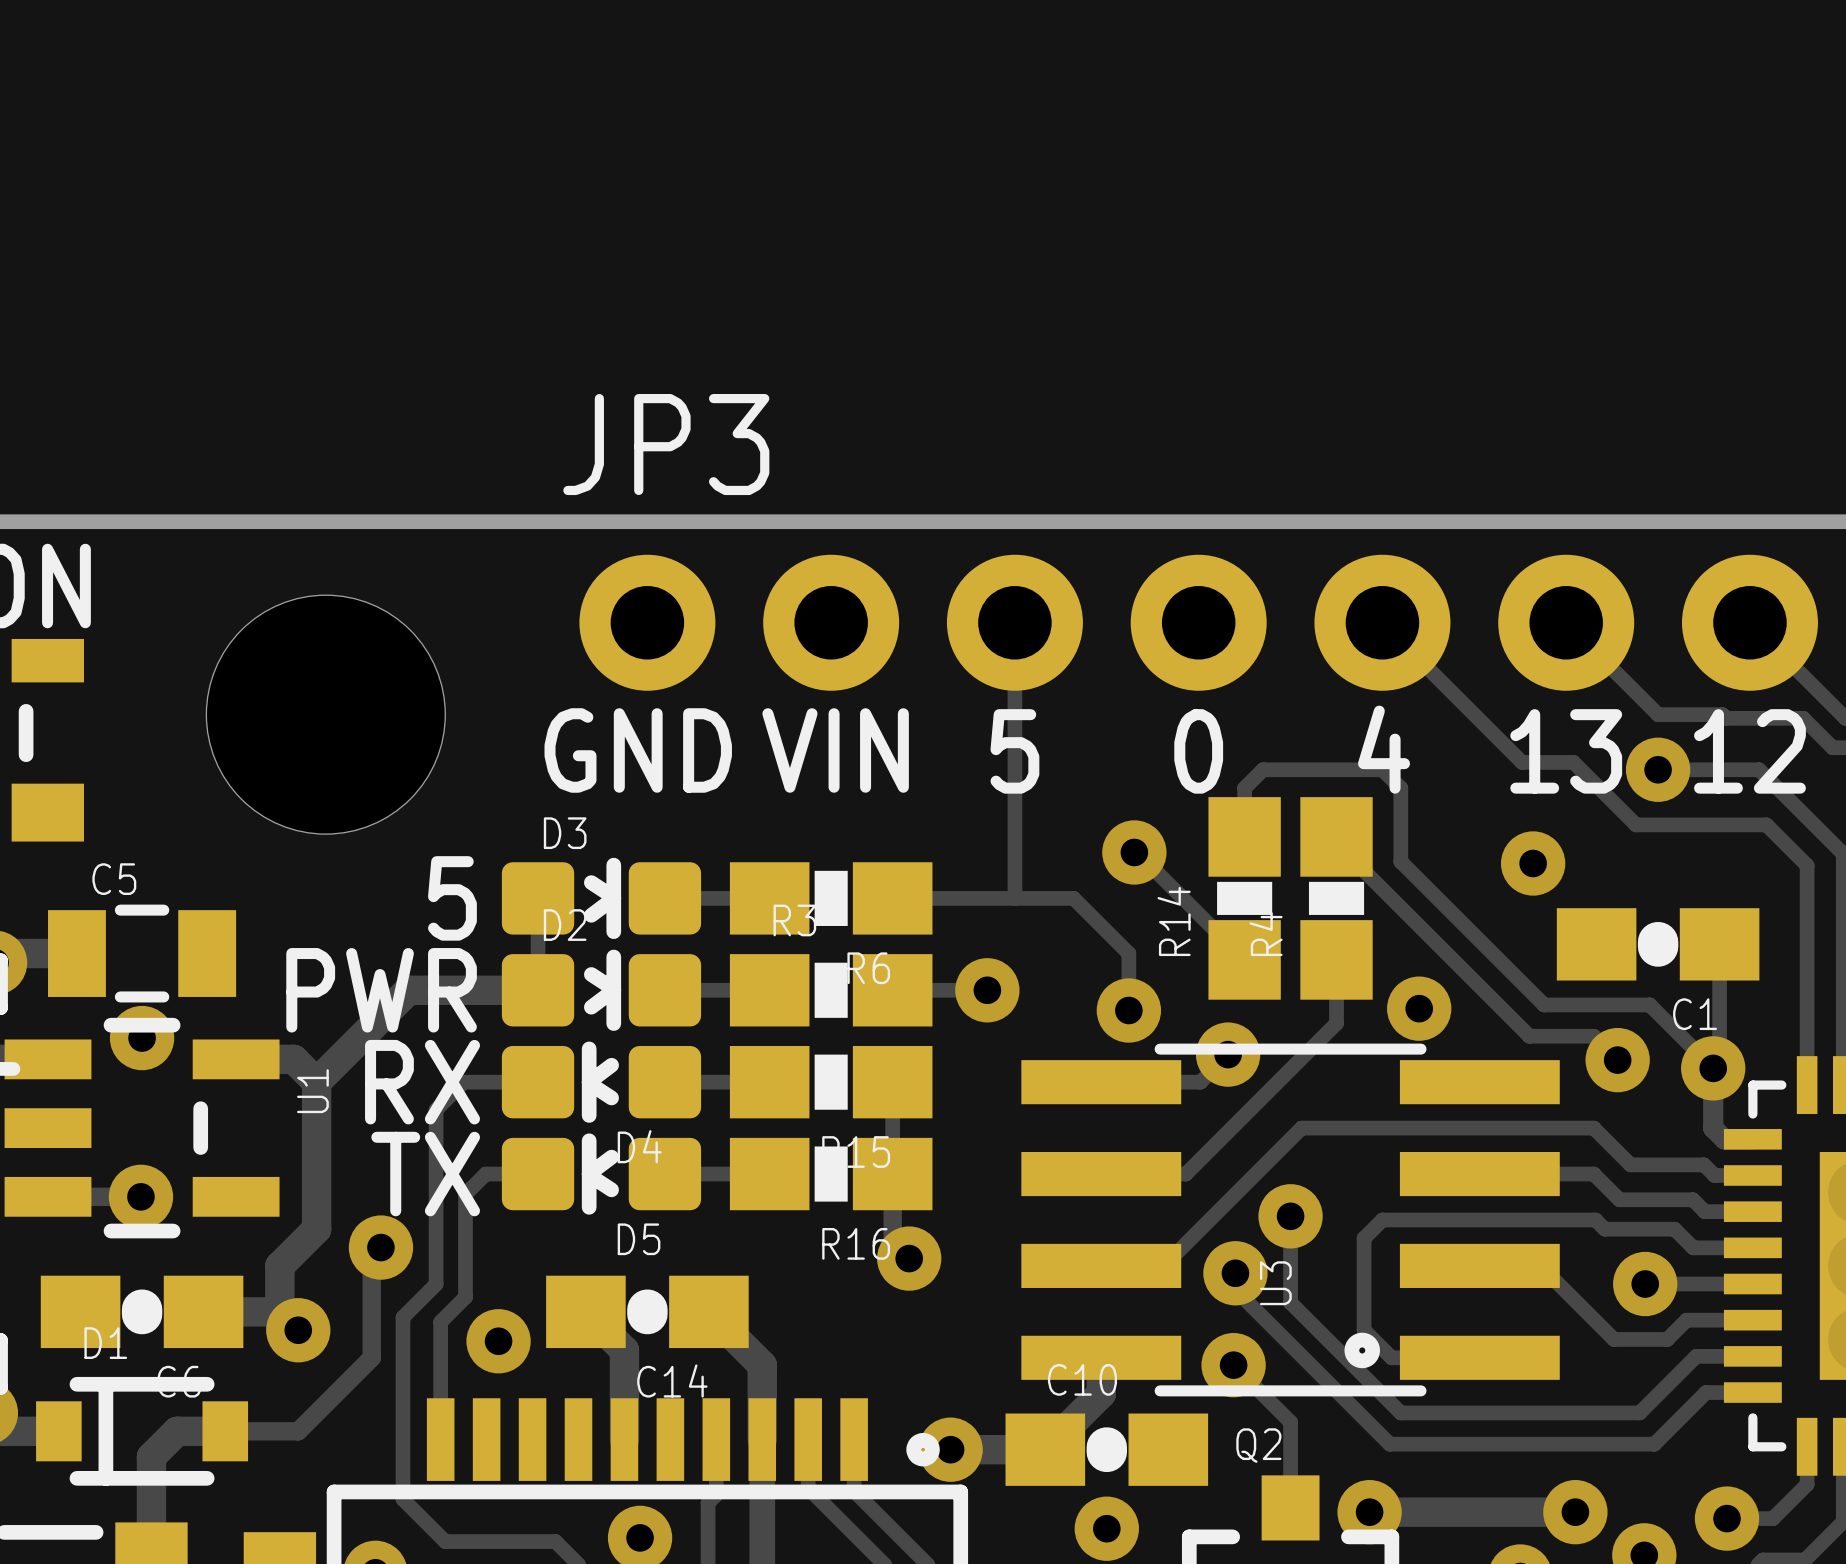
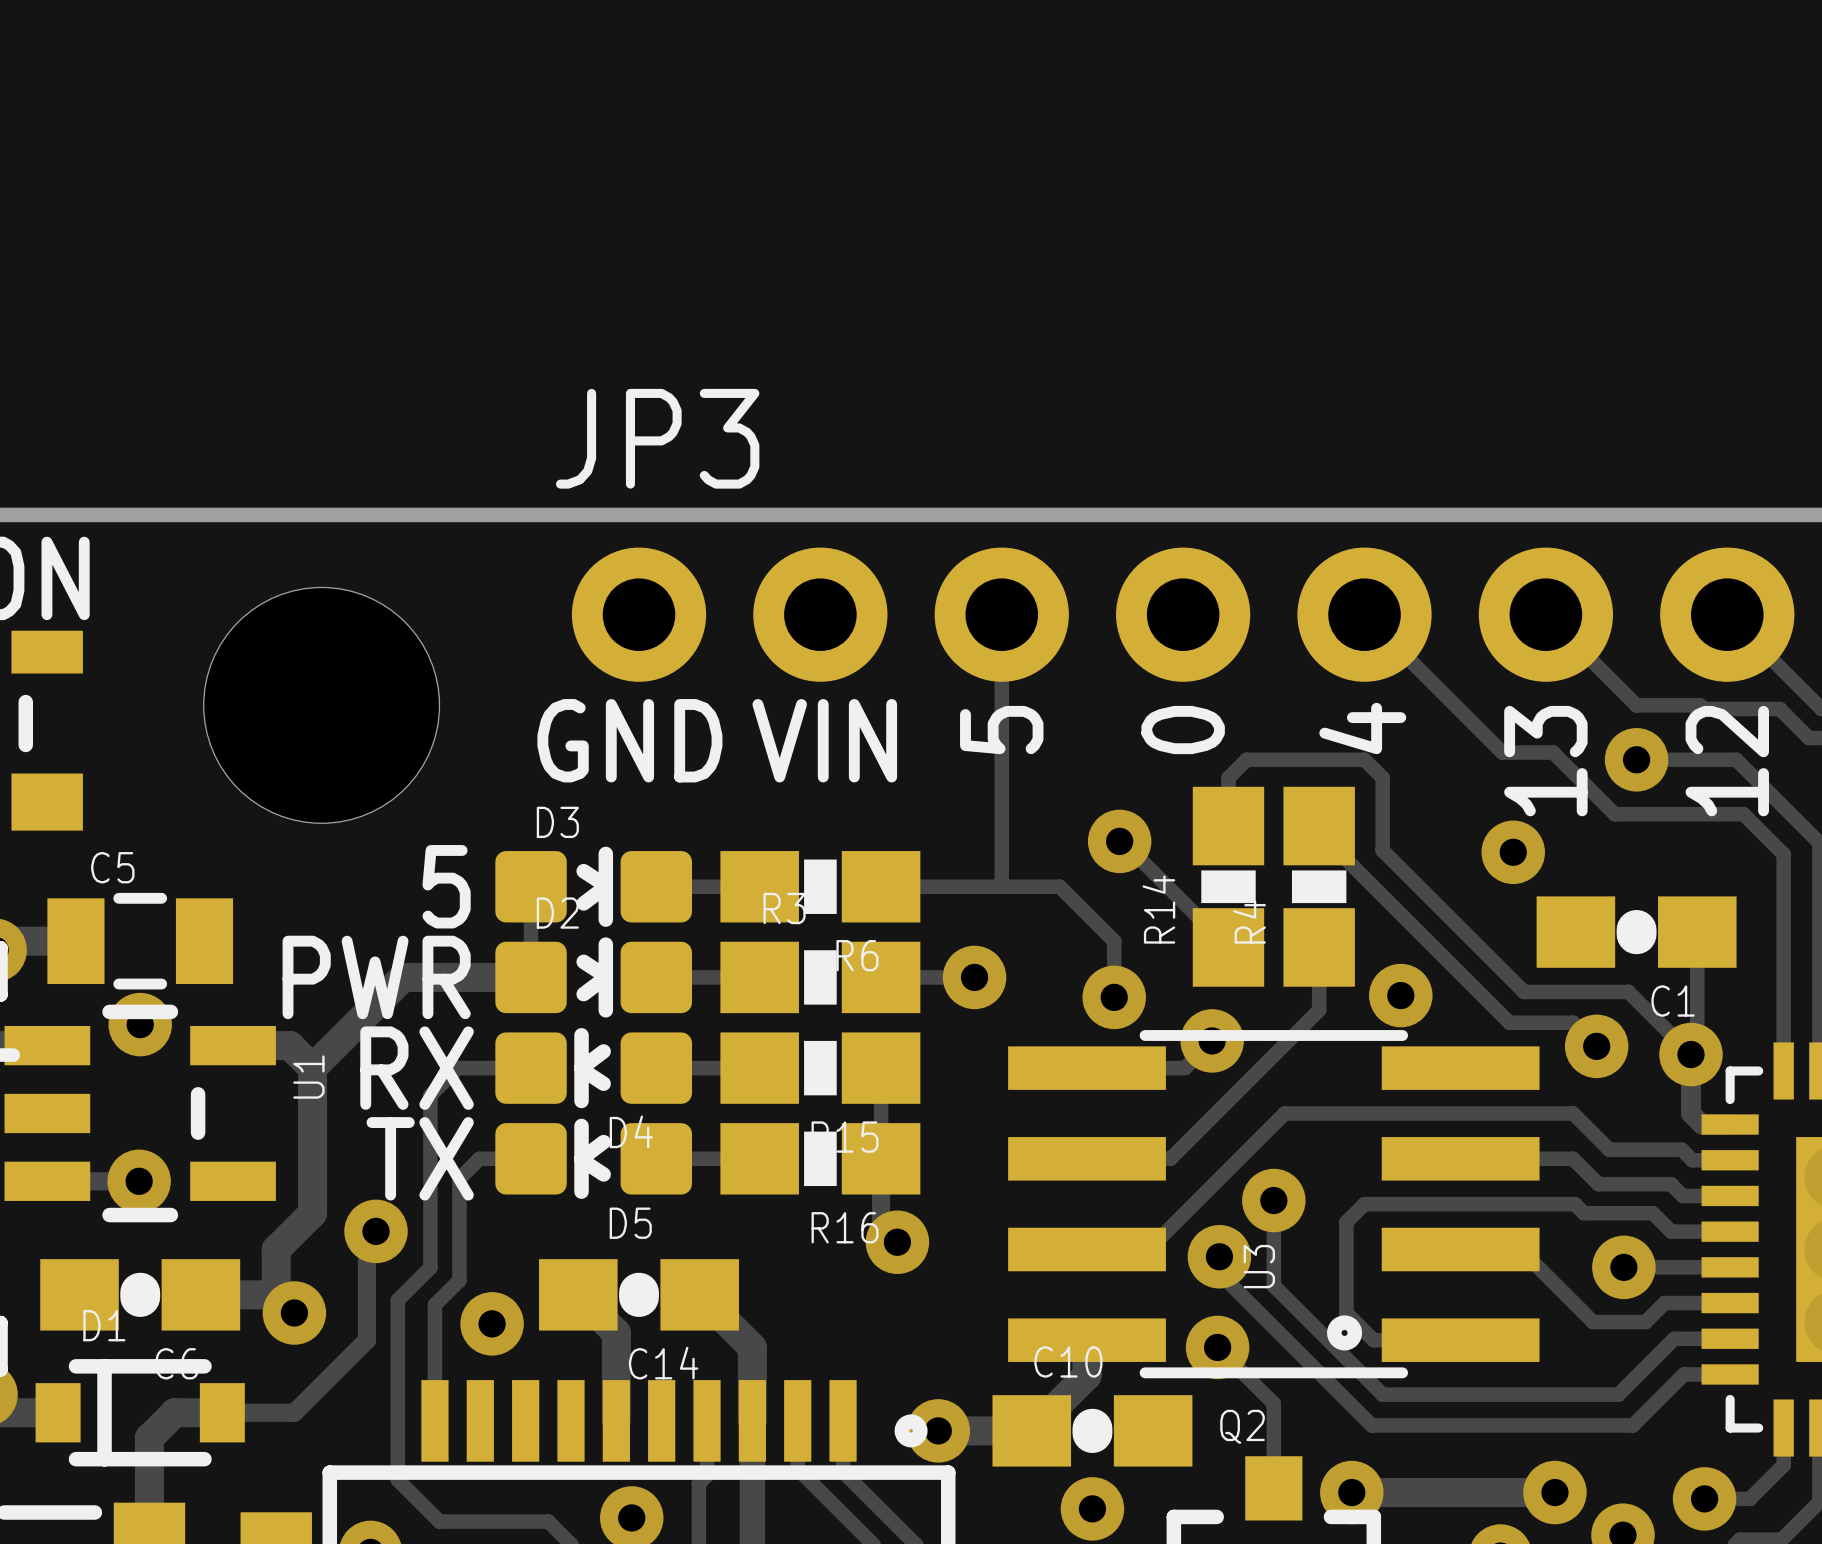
text rotation: 0° (1384, 749) -> 90° counterclockwise (1362, 728)
text rotation: 0° (1014, 751) -> 90° counterclockwise (1001, 730)
text rotation: 0° (1198, 751) -> 90° counterclockwise (1183, 730)
text rotation: 0° (1566, 751) -> 90° counterclockwise (1545, 761)
text rotation: 0° (1749, 751) -> 90° counterclockwise (1727, 761)

